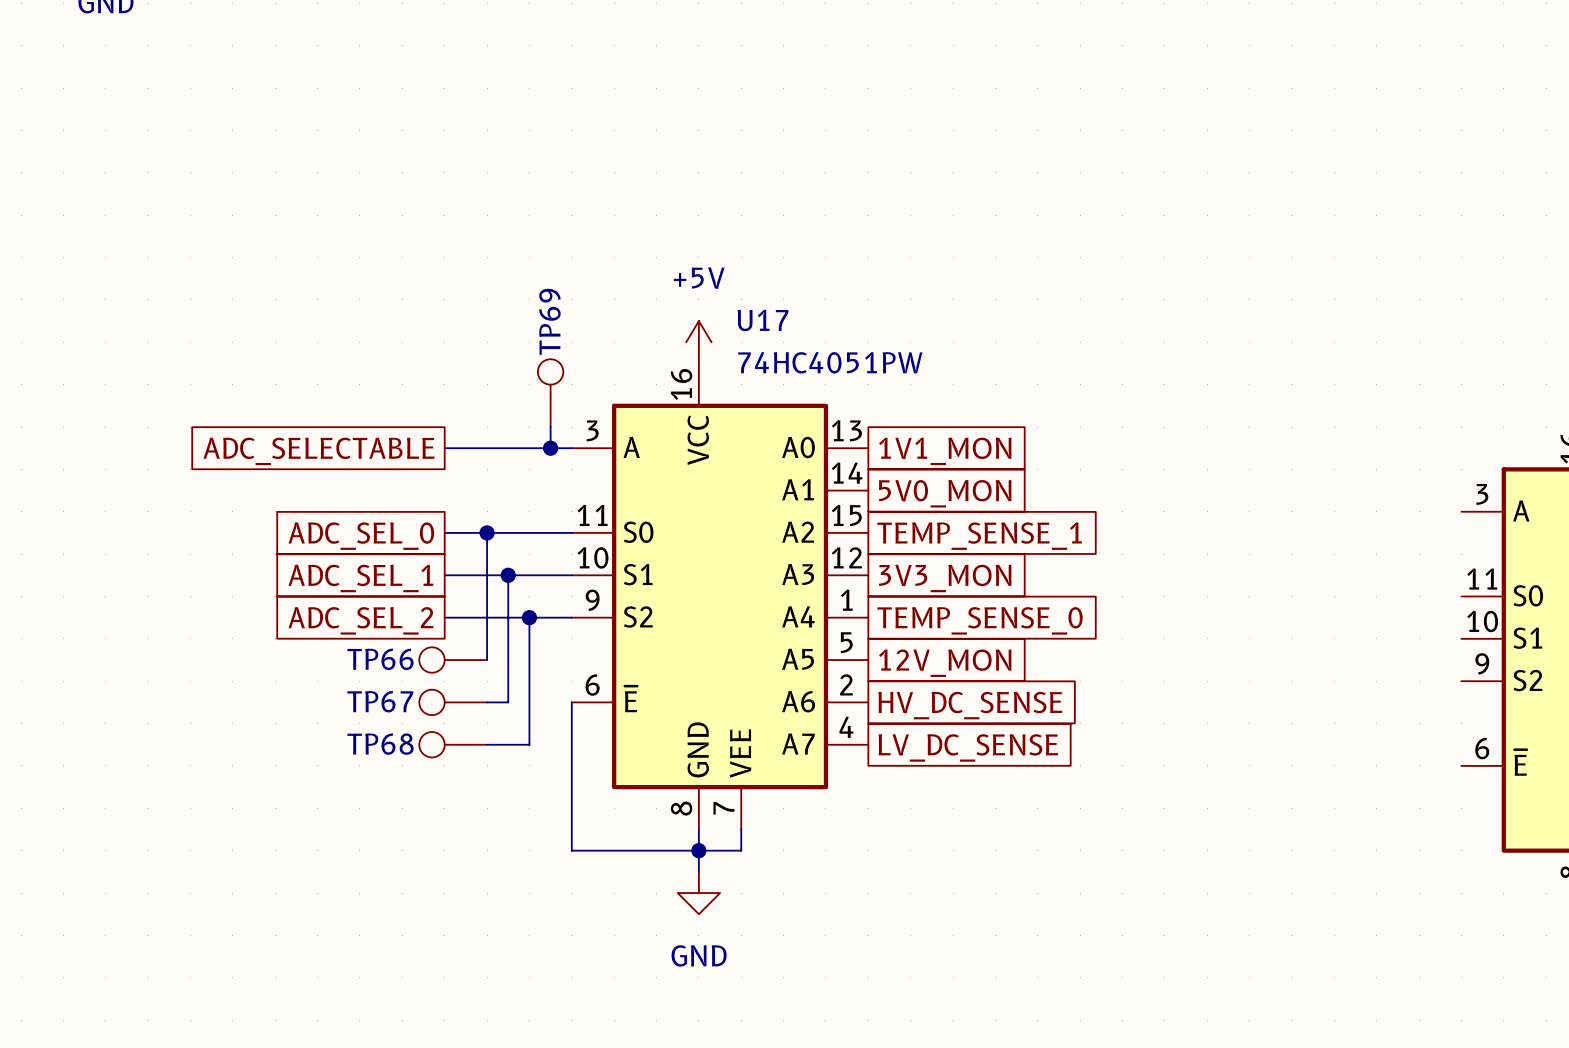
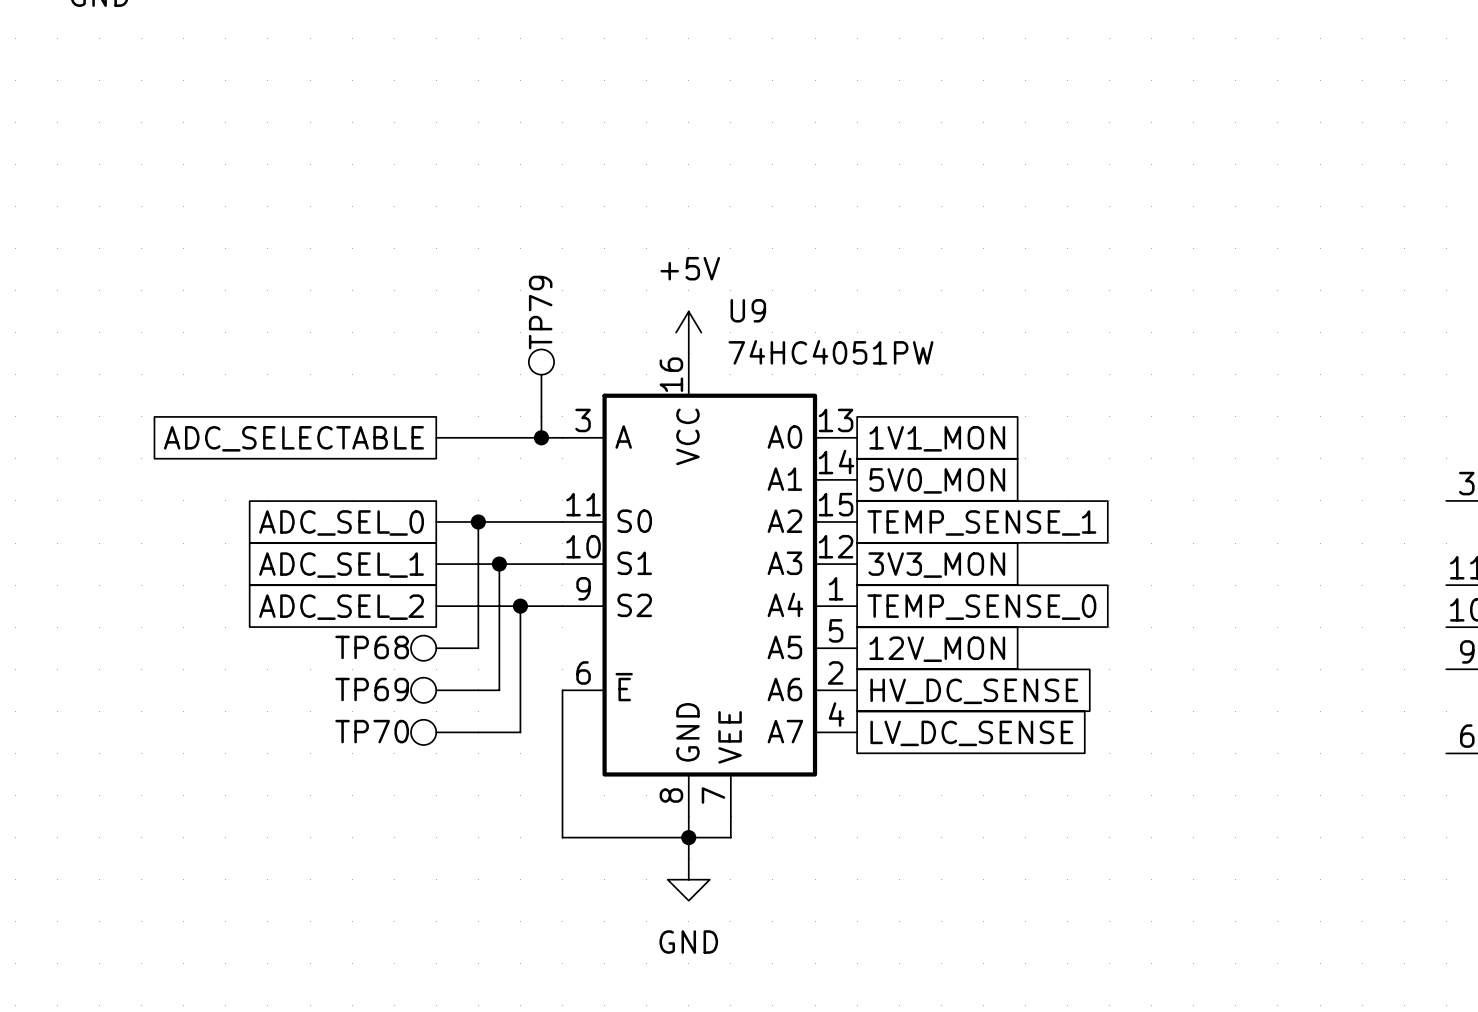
U17 name: U17 (763, 320) -> U9 (748, 310)
TP69 name: TP69 (549, 321) -> TP79 (540, 312)
TP66 name: TP66 (380, 659) -> TP68 (372, 647)
TP67 name: TP67 (380, 701) -> TP69 (372, 689)
TP68 name: TP68 (380, 744) -> TP70 (372, 731)

